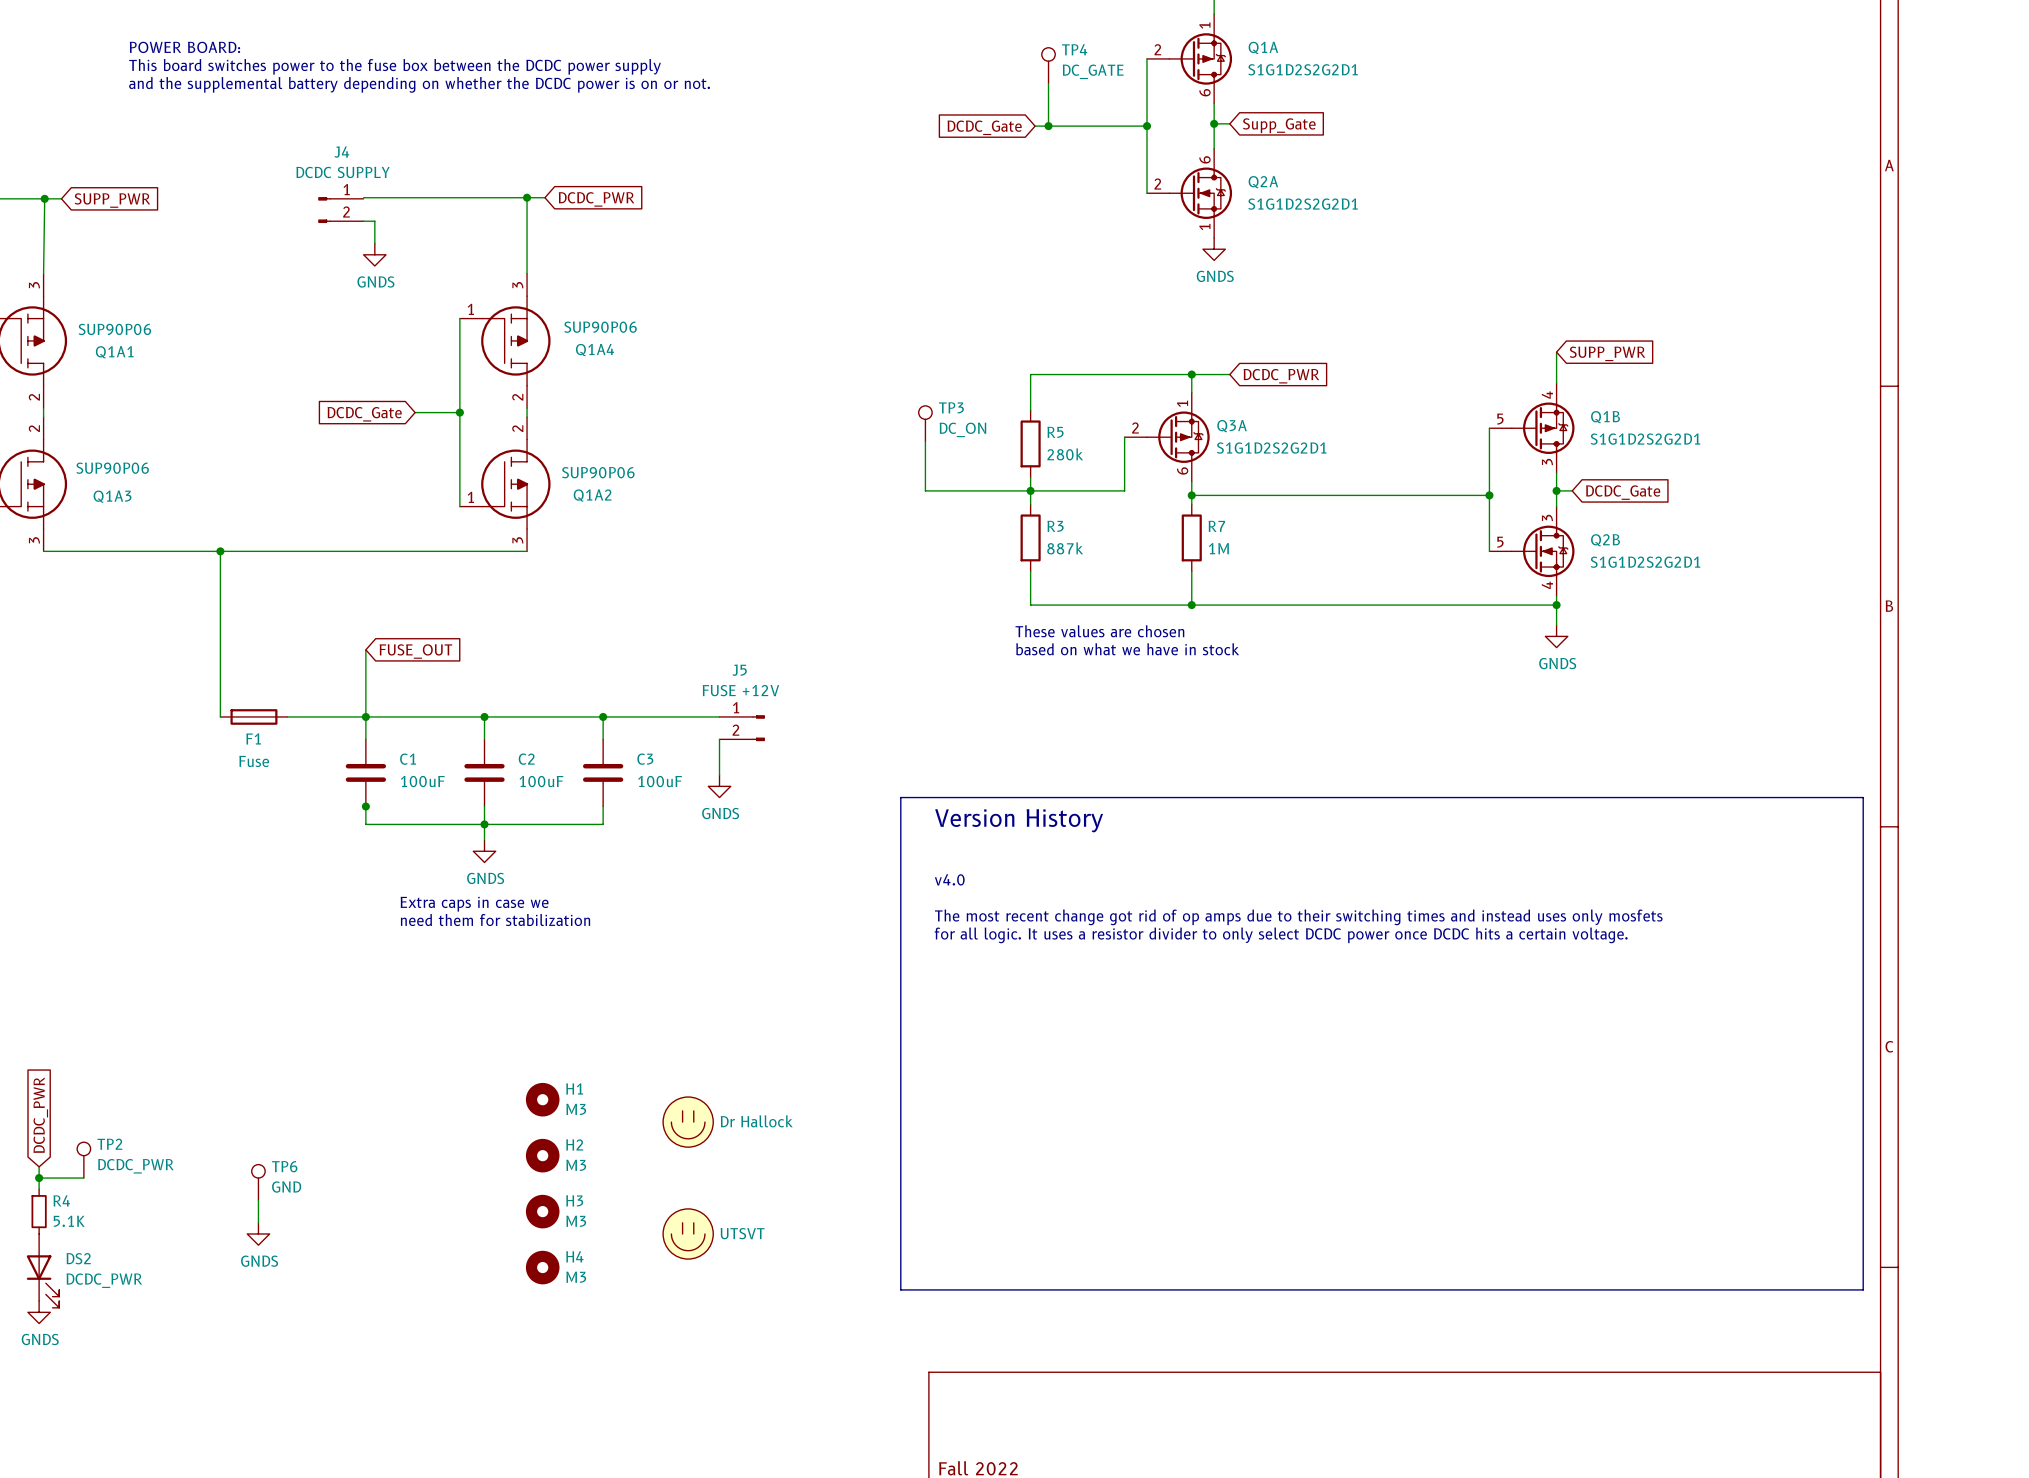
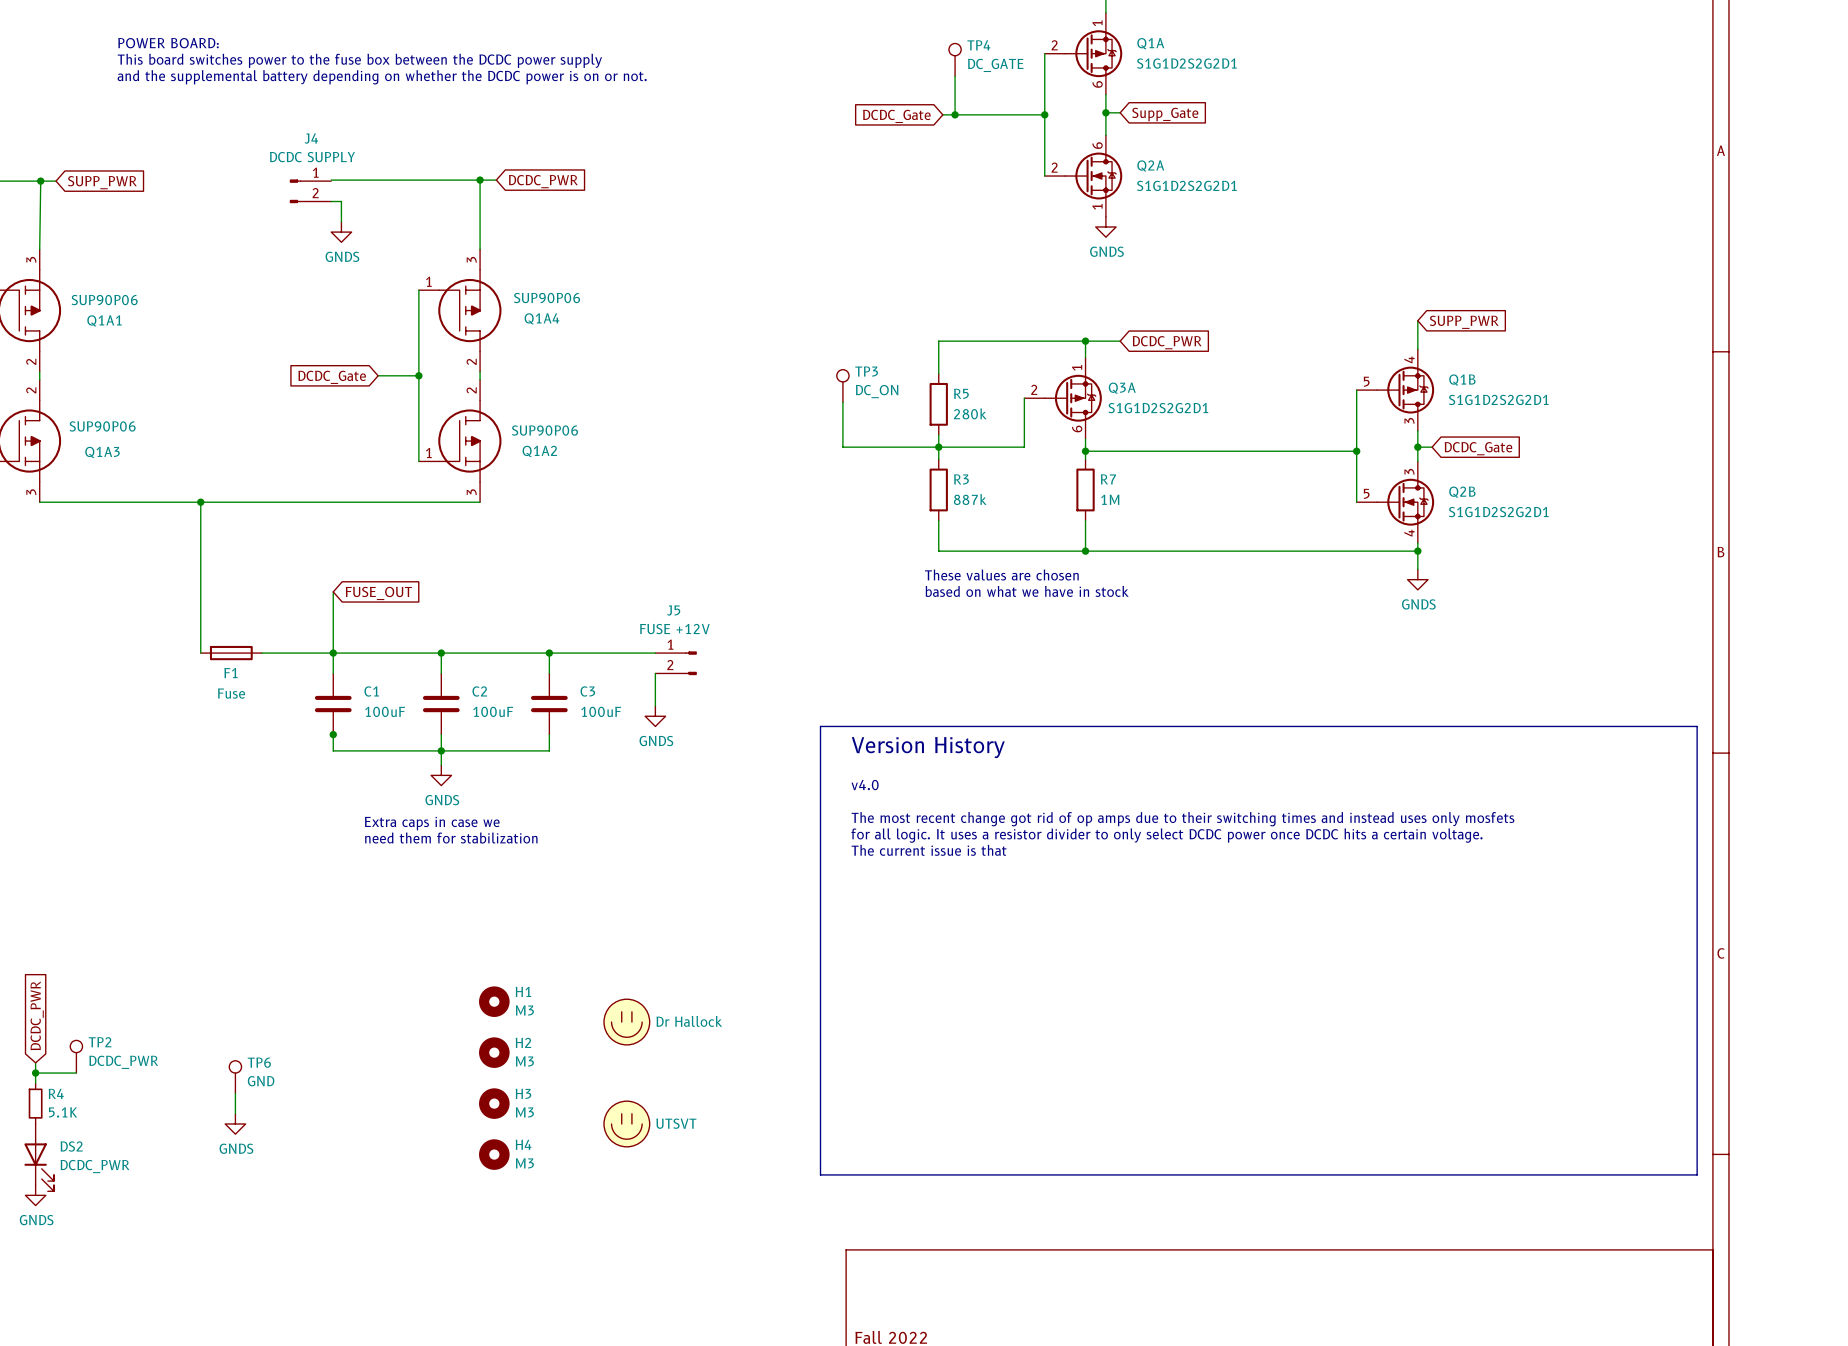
text position: v4.0 (949, 879) -> v4.0 (865, 785)
text: none -> The most recent change got rid of op amps due to their switching times and instead uses only mosfets (1182, 819)
text: The most recent change got rid of op amps due to their switching times and instead uses only mosfets (1298, 917) -> for all logic. It uses a resistor divider to only select DCDC power once DCDC hits a certain voltage. (1166, 835)
text: for all logic. It uses a resistor divider to only select DCDC power once DCDC hits a certain voltage. (1281, 935) -> The current issue is that (929, 850)

